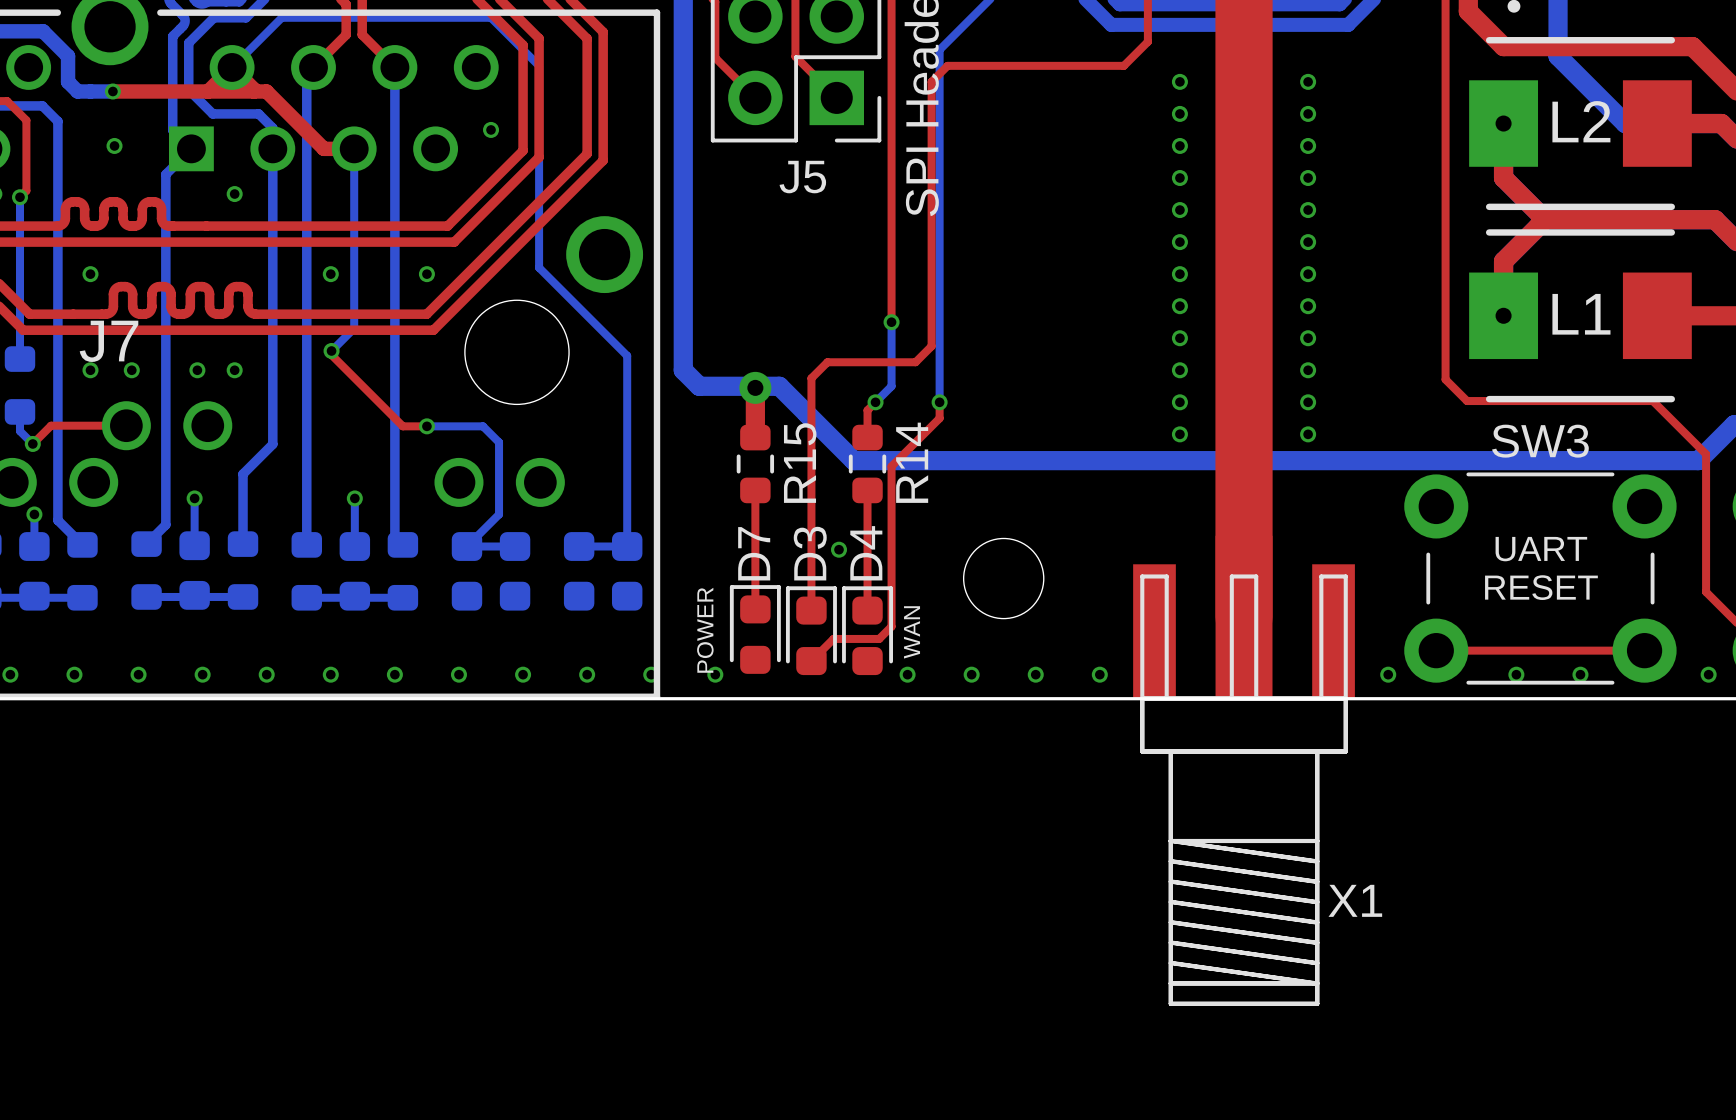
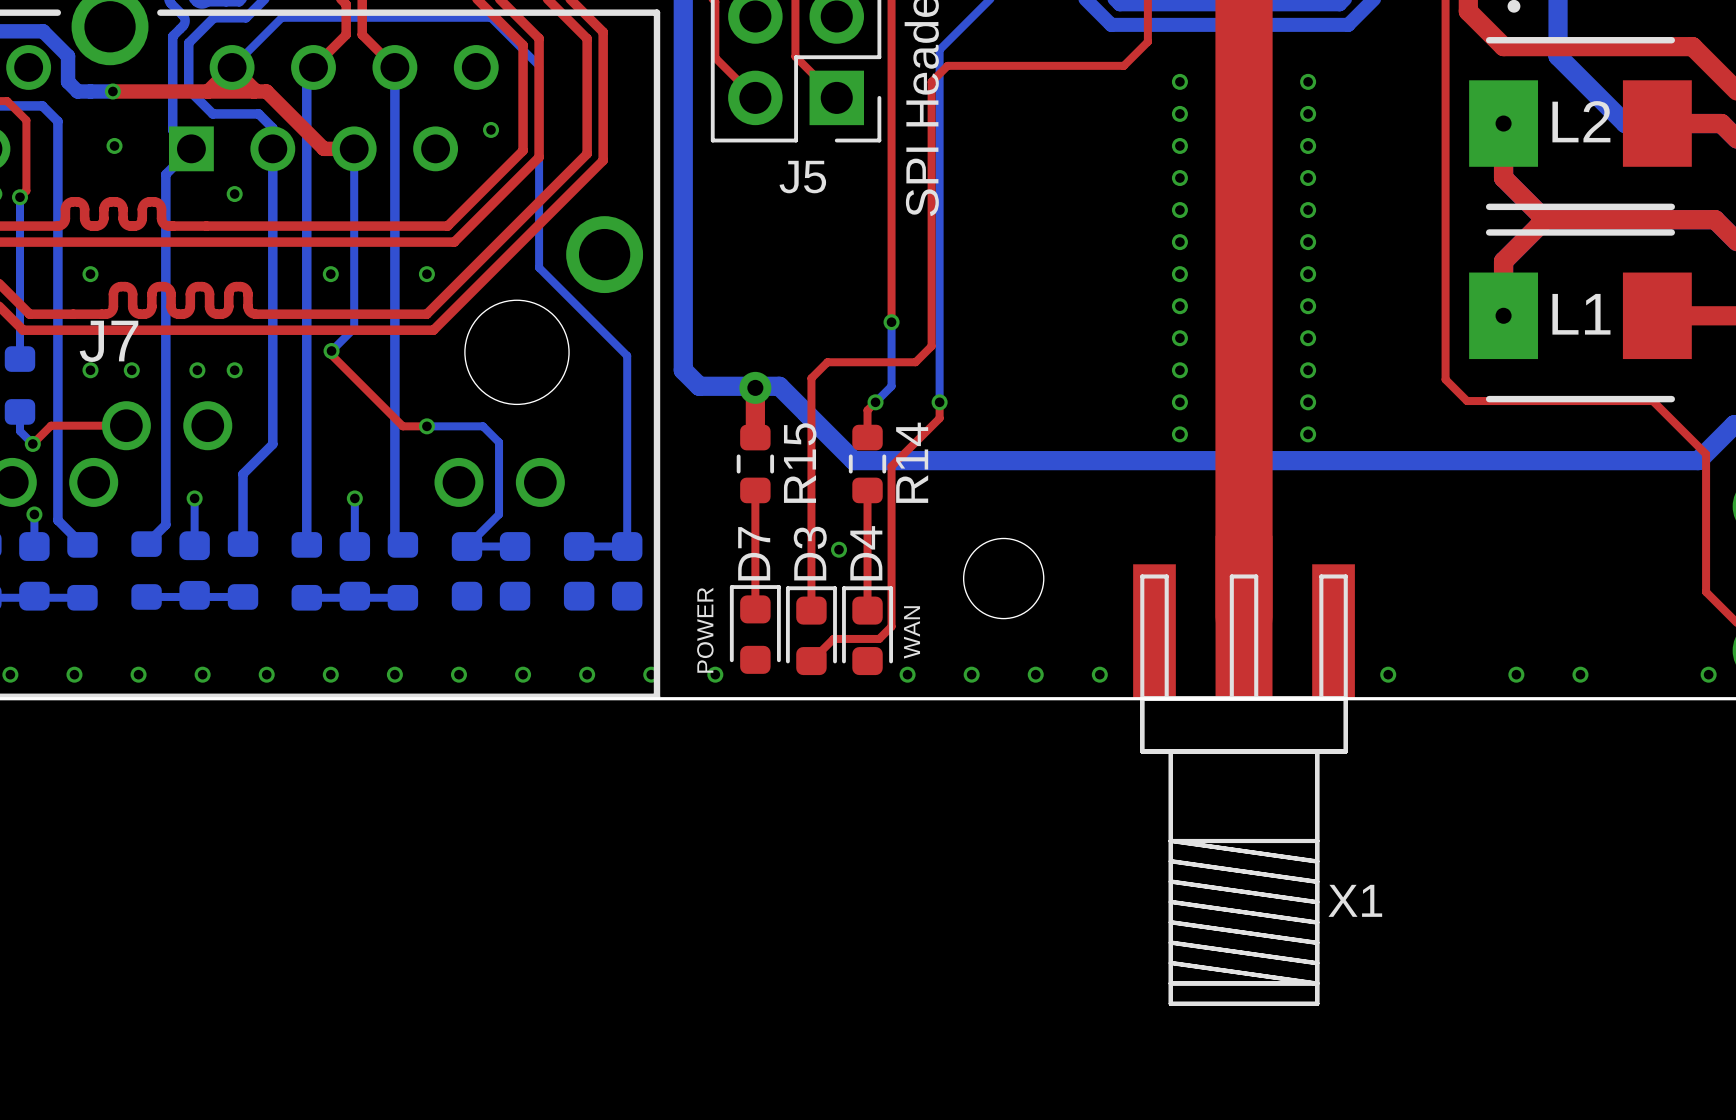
text: UART (1541, 549) -> none
SW3: (1540, 578) -> none
text: RESET (1541, 587) -> none
top track: (1436, 650) (1644, 650) -> none

